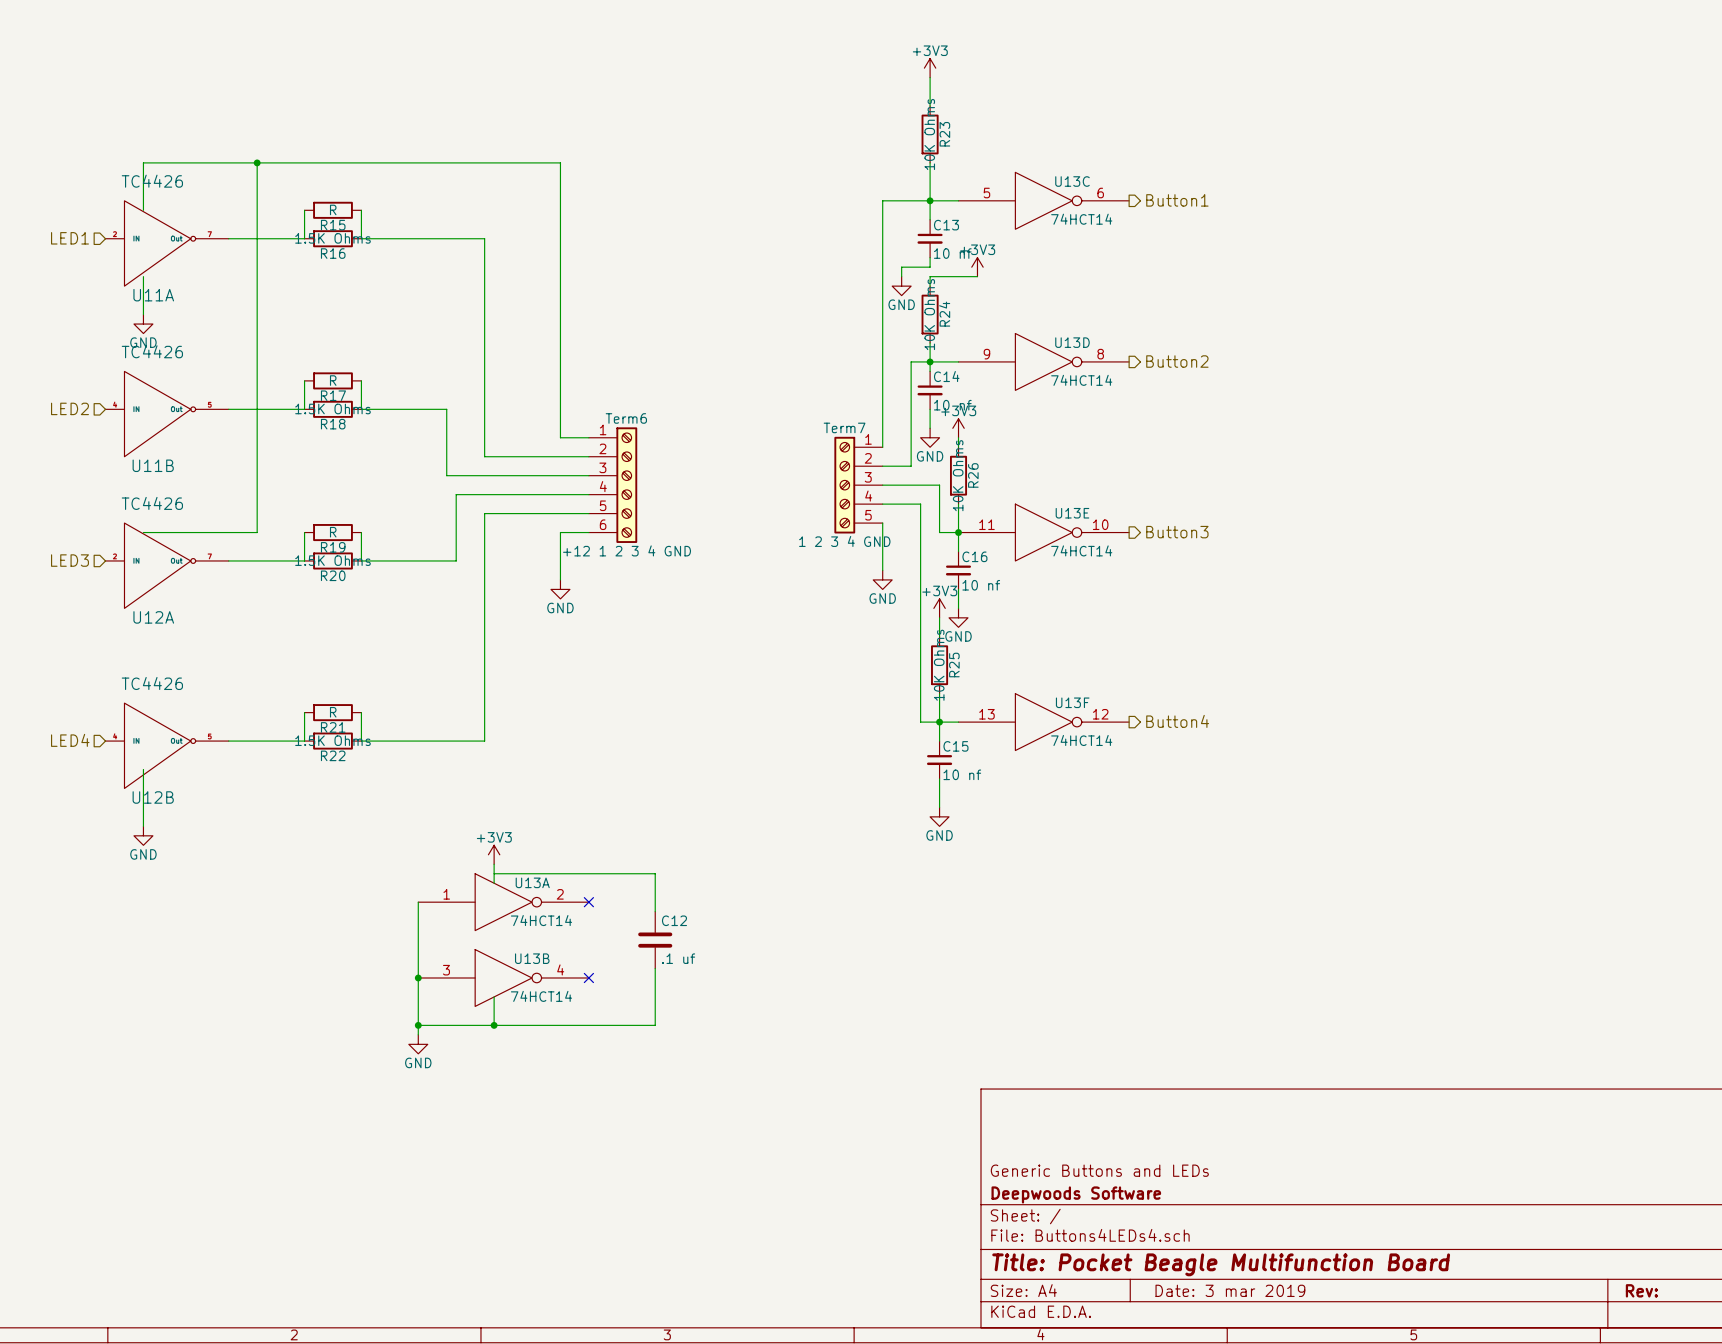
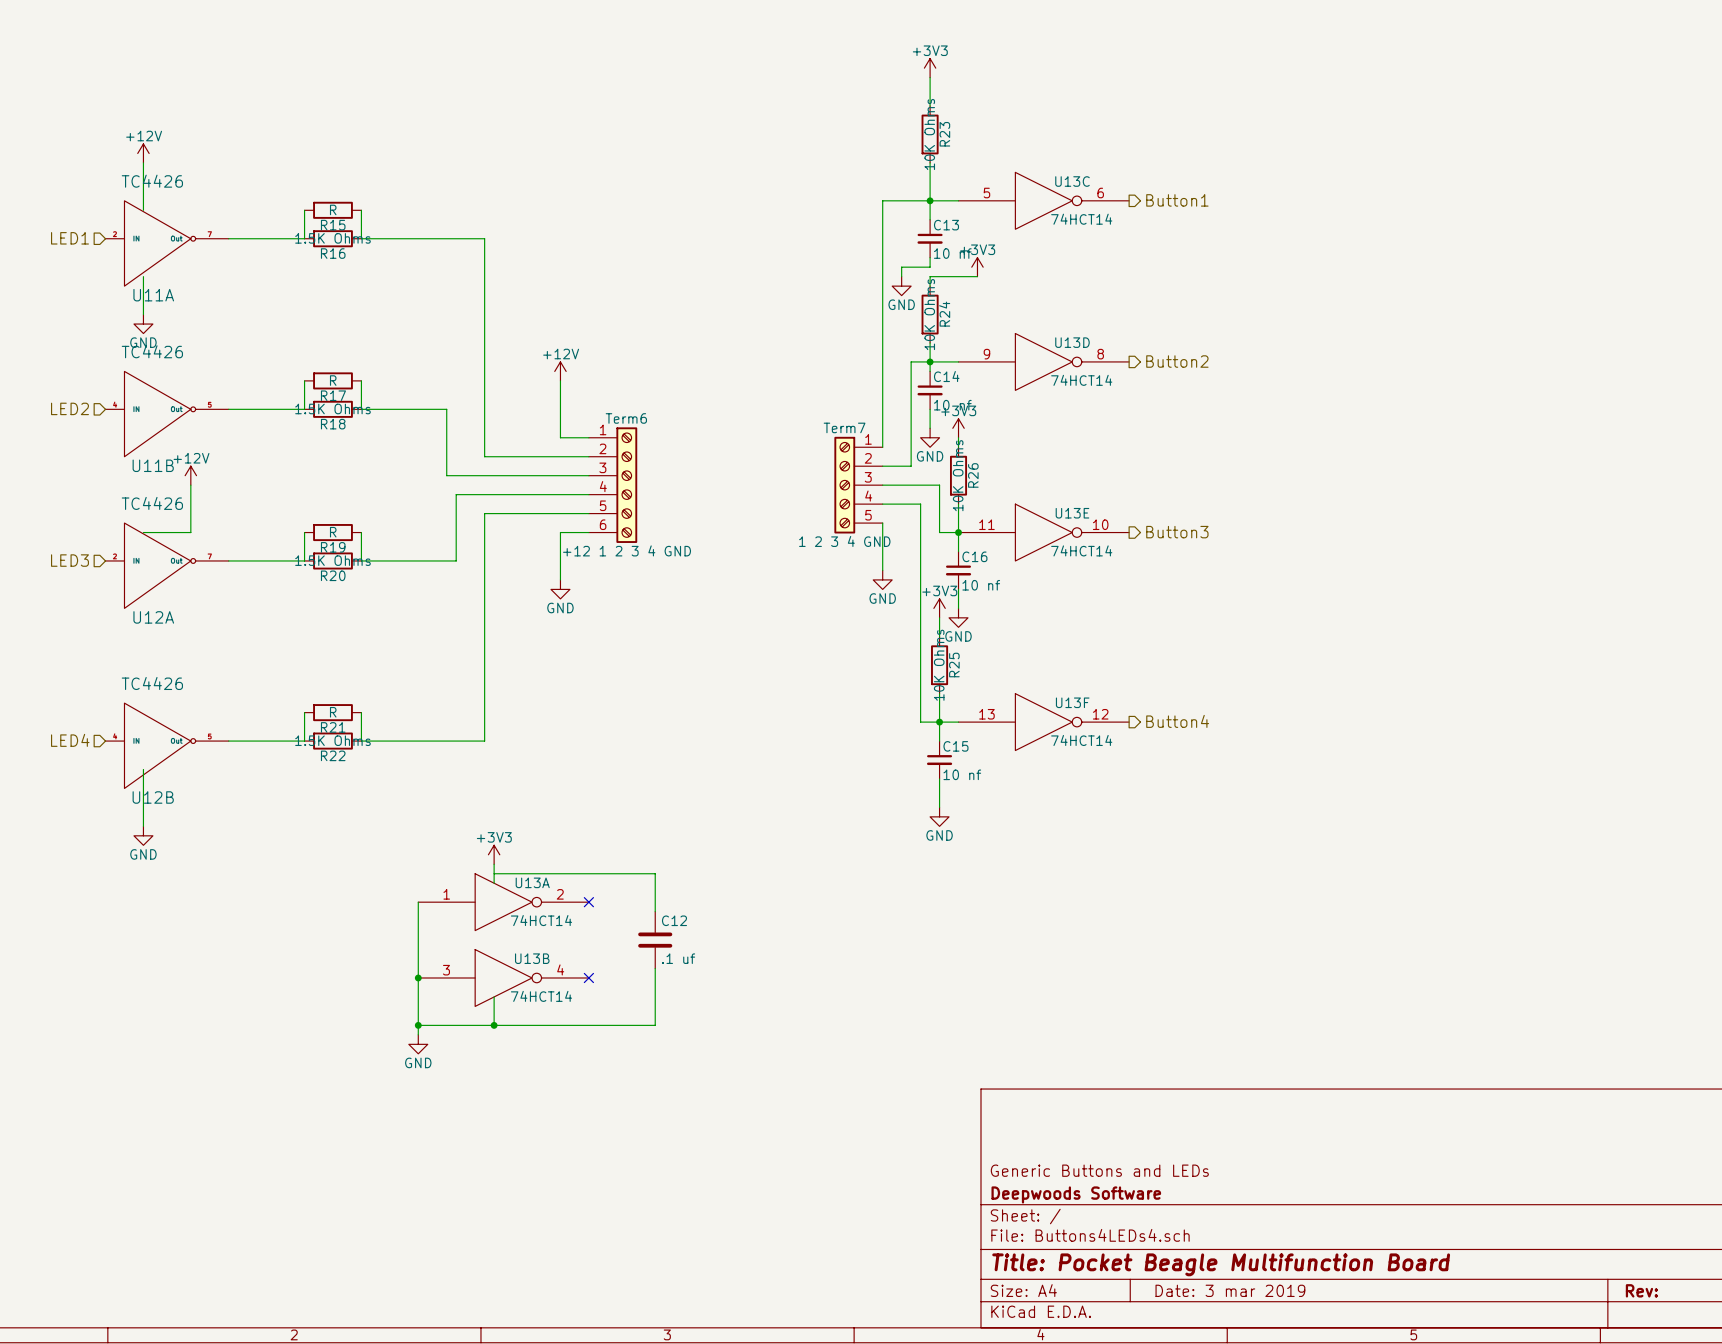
power symbol: none -> +12V (143, 153)
wire: (143, 162) (560, 162) (560, 380) -> none
wire: (257, 162) (257, 532) (190, 532) -> (190, 485) (190, 532)
junction: (257, 162) -> none
power symbol: none -> +12V (560, 371)
power symbol: none -> +12V (190, 475)

